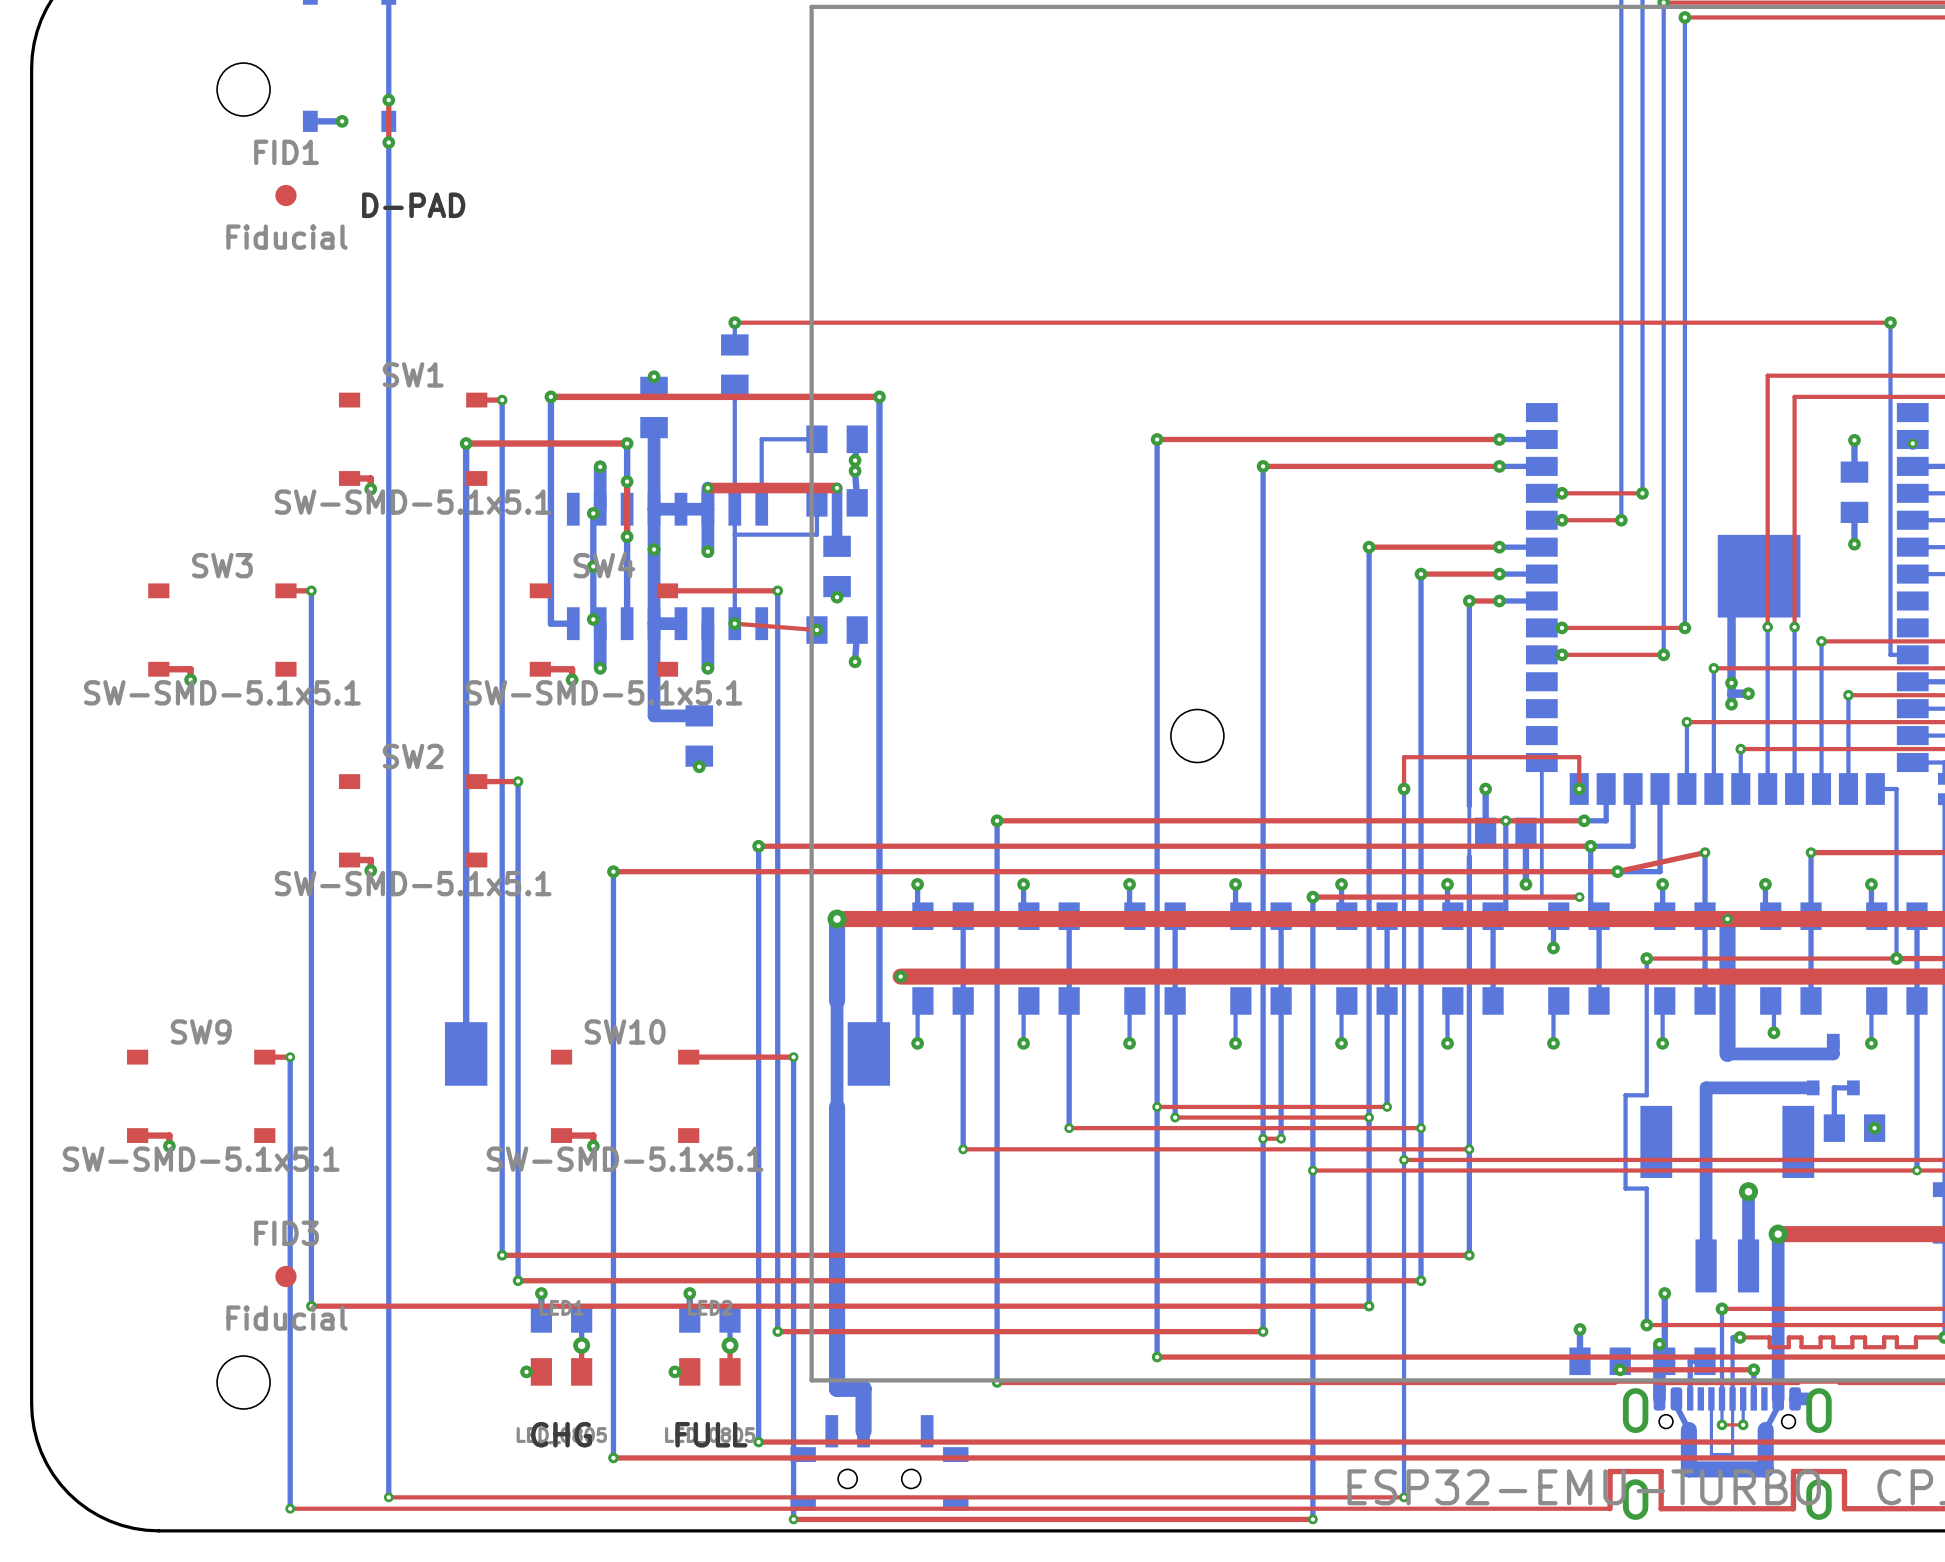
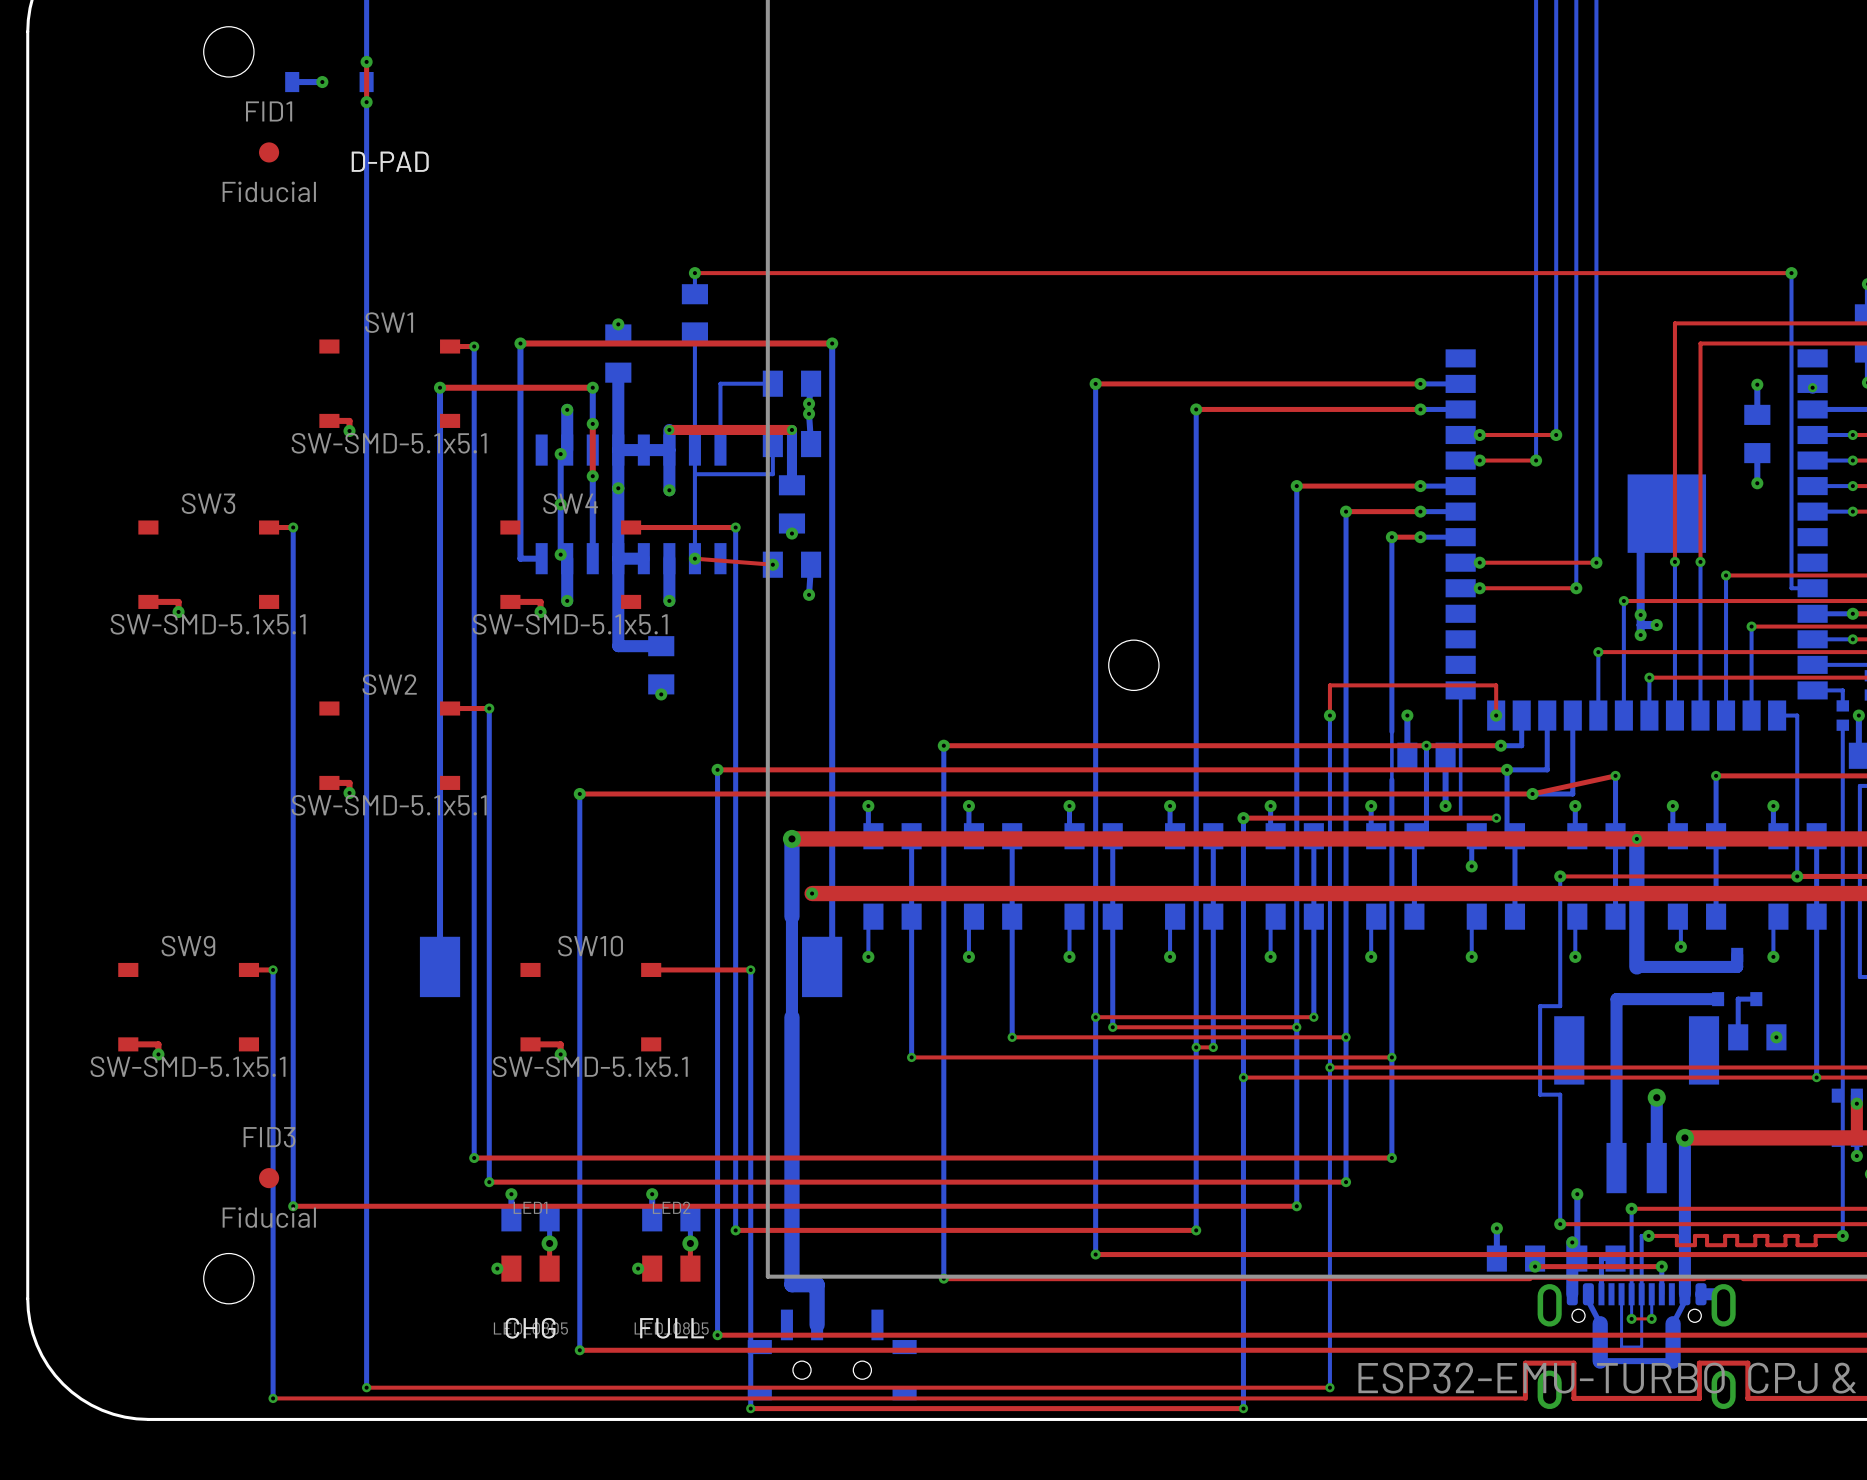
top track: none -> (812, 893) (852, 893)
via position: (900, 976) -> (812, 893)
bottom track width: thick (1688, 1469) (1765, 1469) -> thin (1600, 1361) (1673, 1361)

